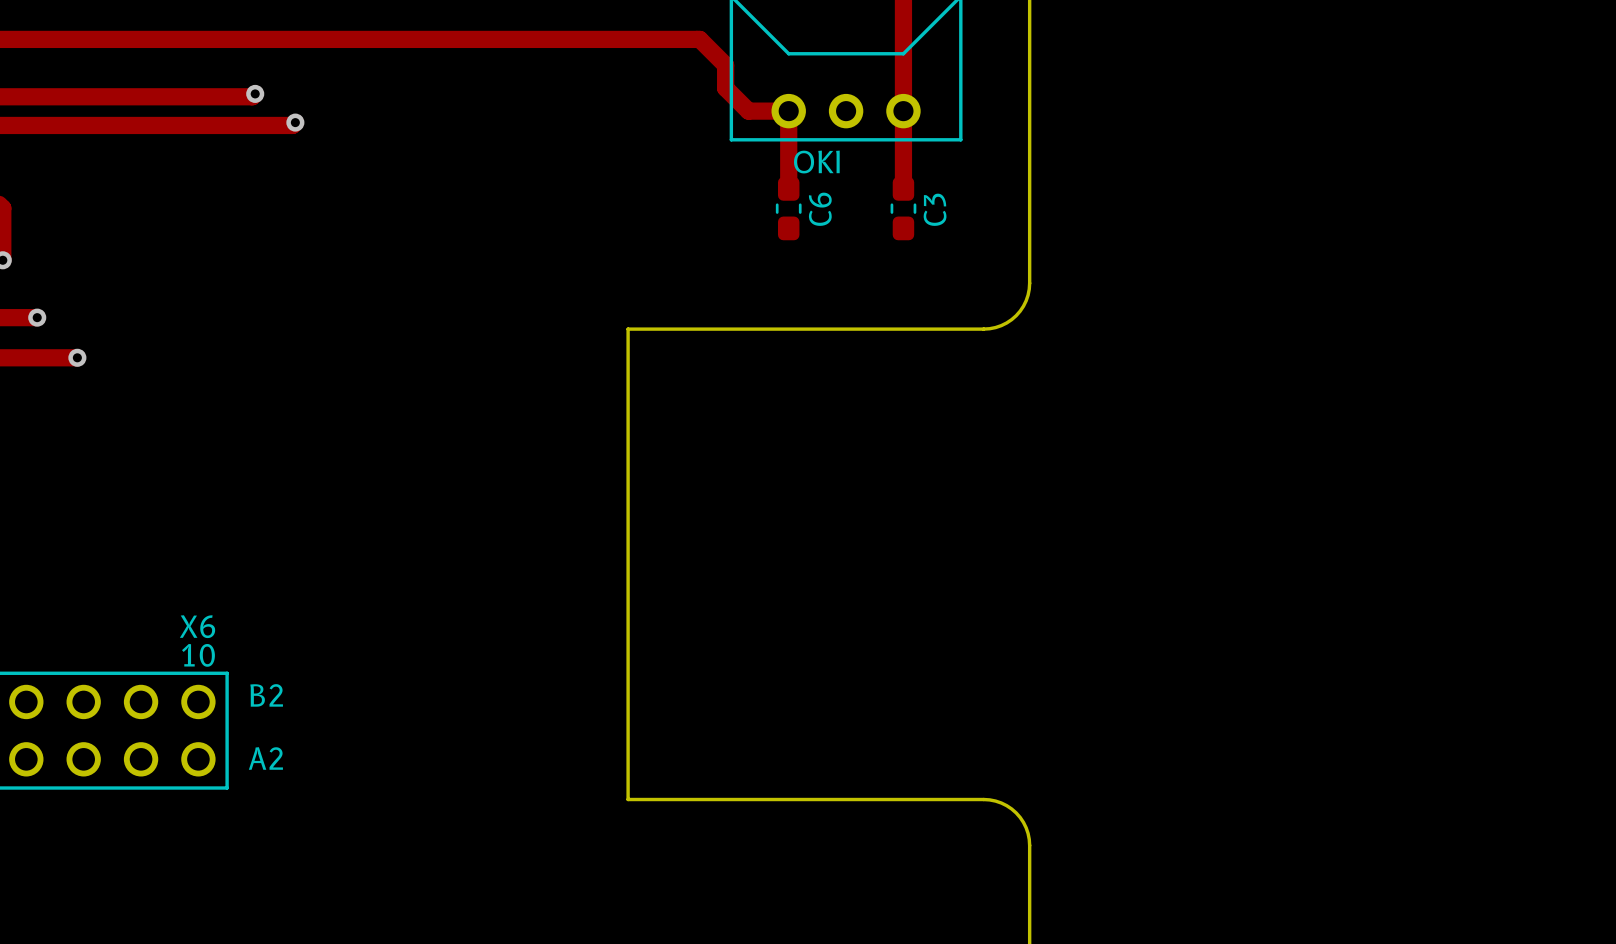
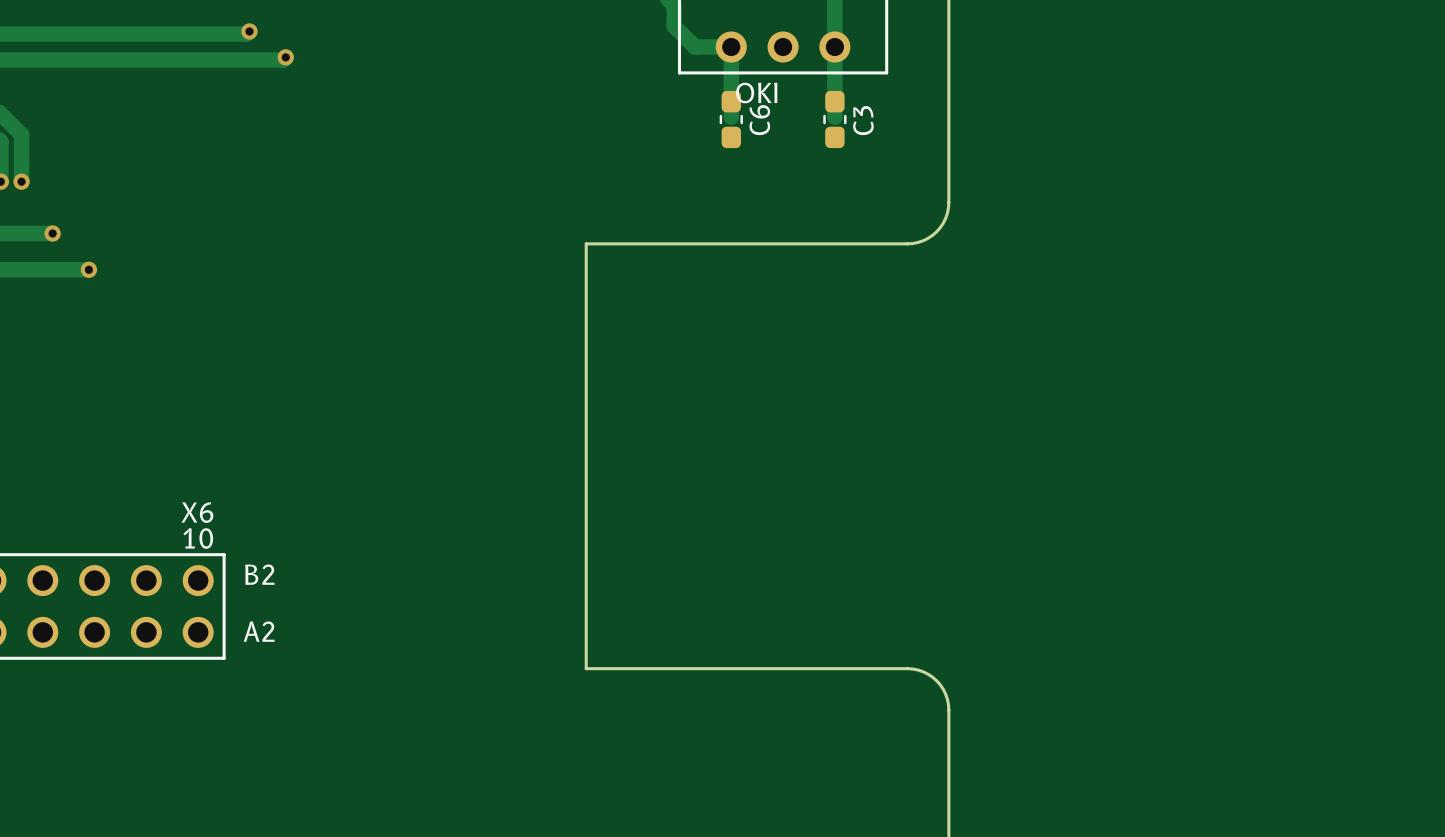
C6 position: (788, 208) -> (731, 119)
C3 position: (903, 208) -> (834, 119)

